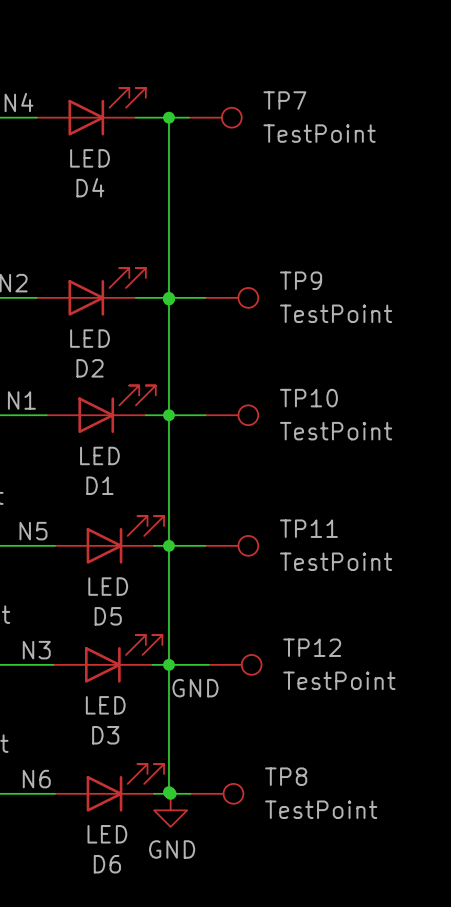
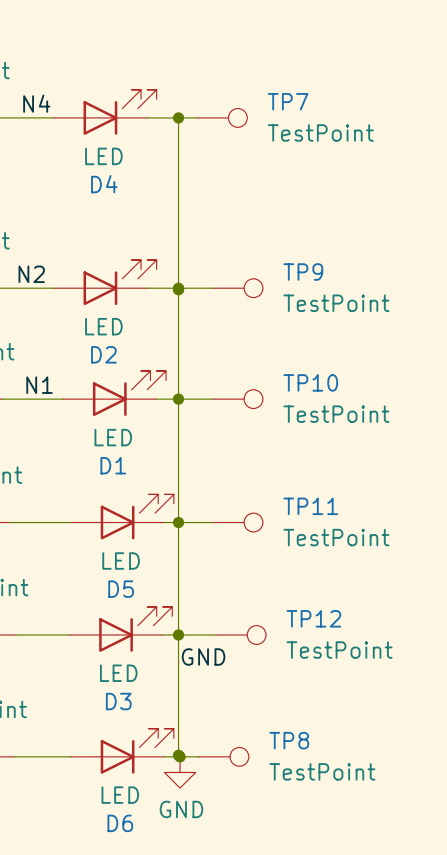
label: N5 (33, 531) -> none
label: N3 (36, 650) -> none
label: N6 (36, 779) -> none

